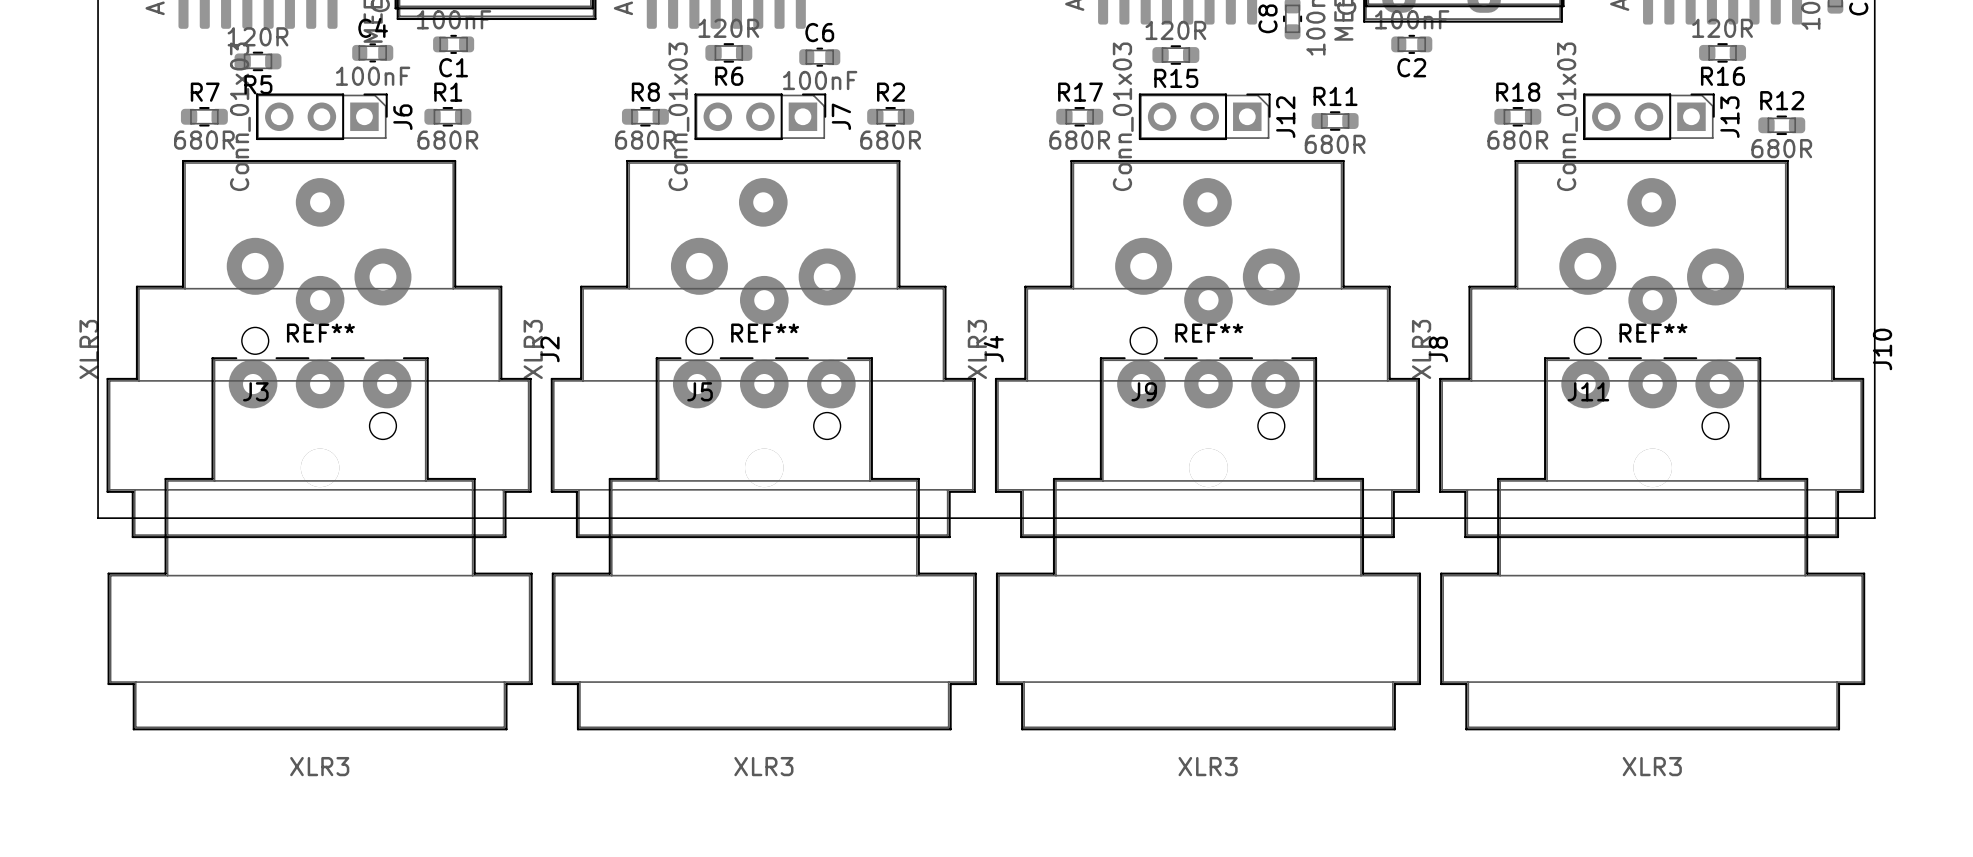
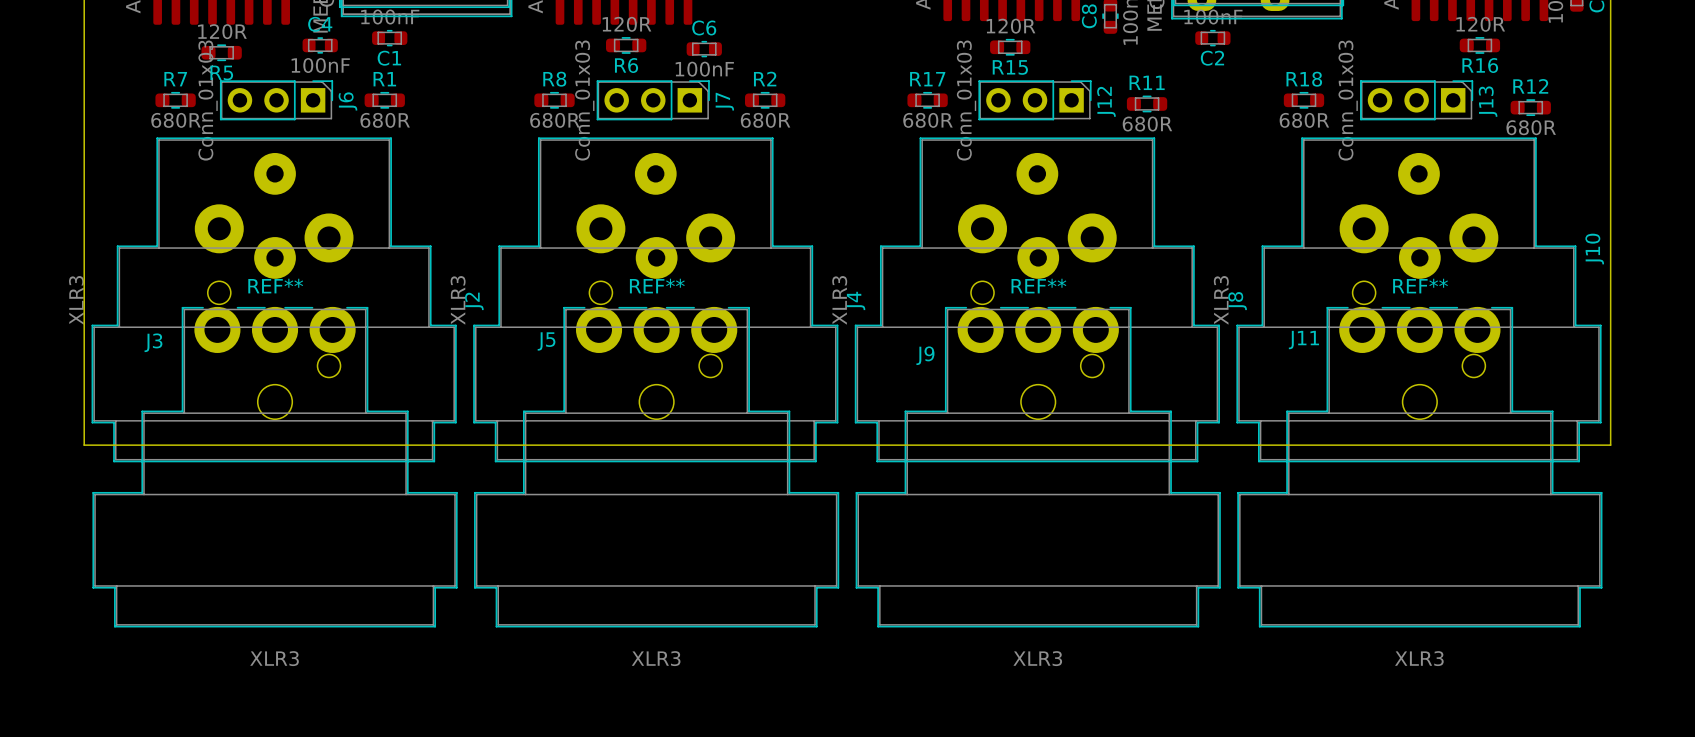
J3 footprint: [107, 275, 533, 731] -> [92, 237, 458, 628]
J5 footprint: [551, 275, 977, 731] -> [474, 237, 840, 628]
J9 footprint: [995, 275, 1422, 731] -> [855, 237, 1221, 628]
J11 footprint: [1440, 275, 1866, 731] -> [1237, 237, 1603, 628]
J10 name position: J10 (1882, 349) -> J10 (1594, 249)
J3 name position: J3 (255, 391) -> J3 (153, 342)
J5 name position: J5 (700, 391) -> J5 (546, 341)
J9 name position: J9 (1144, 391) -> J9 (925, 355)
J11 name position: J11 (1588, 391) -> J11 (1303, 340)

